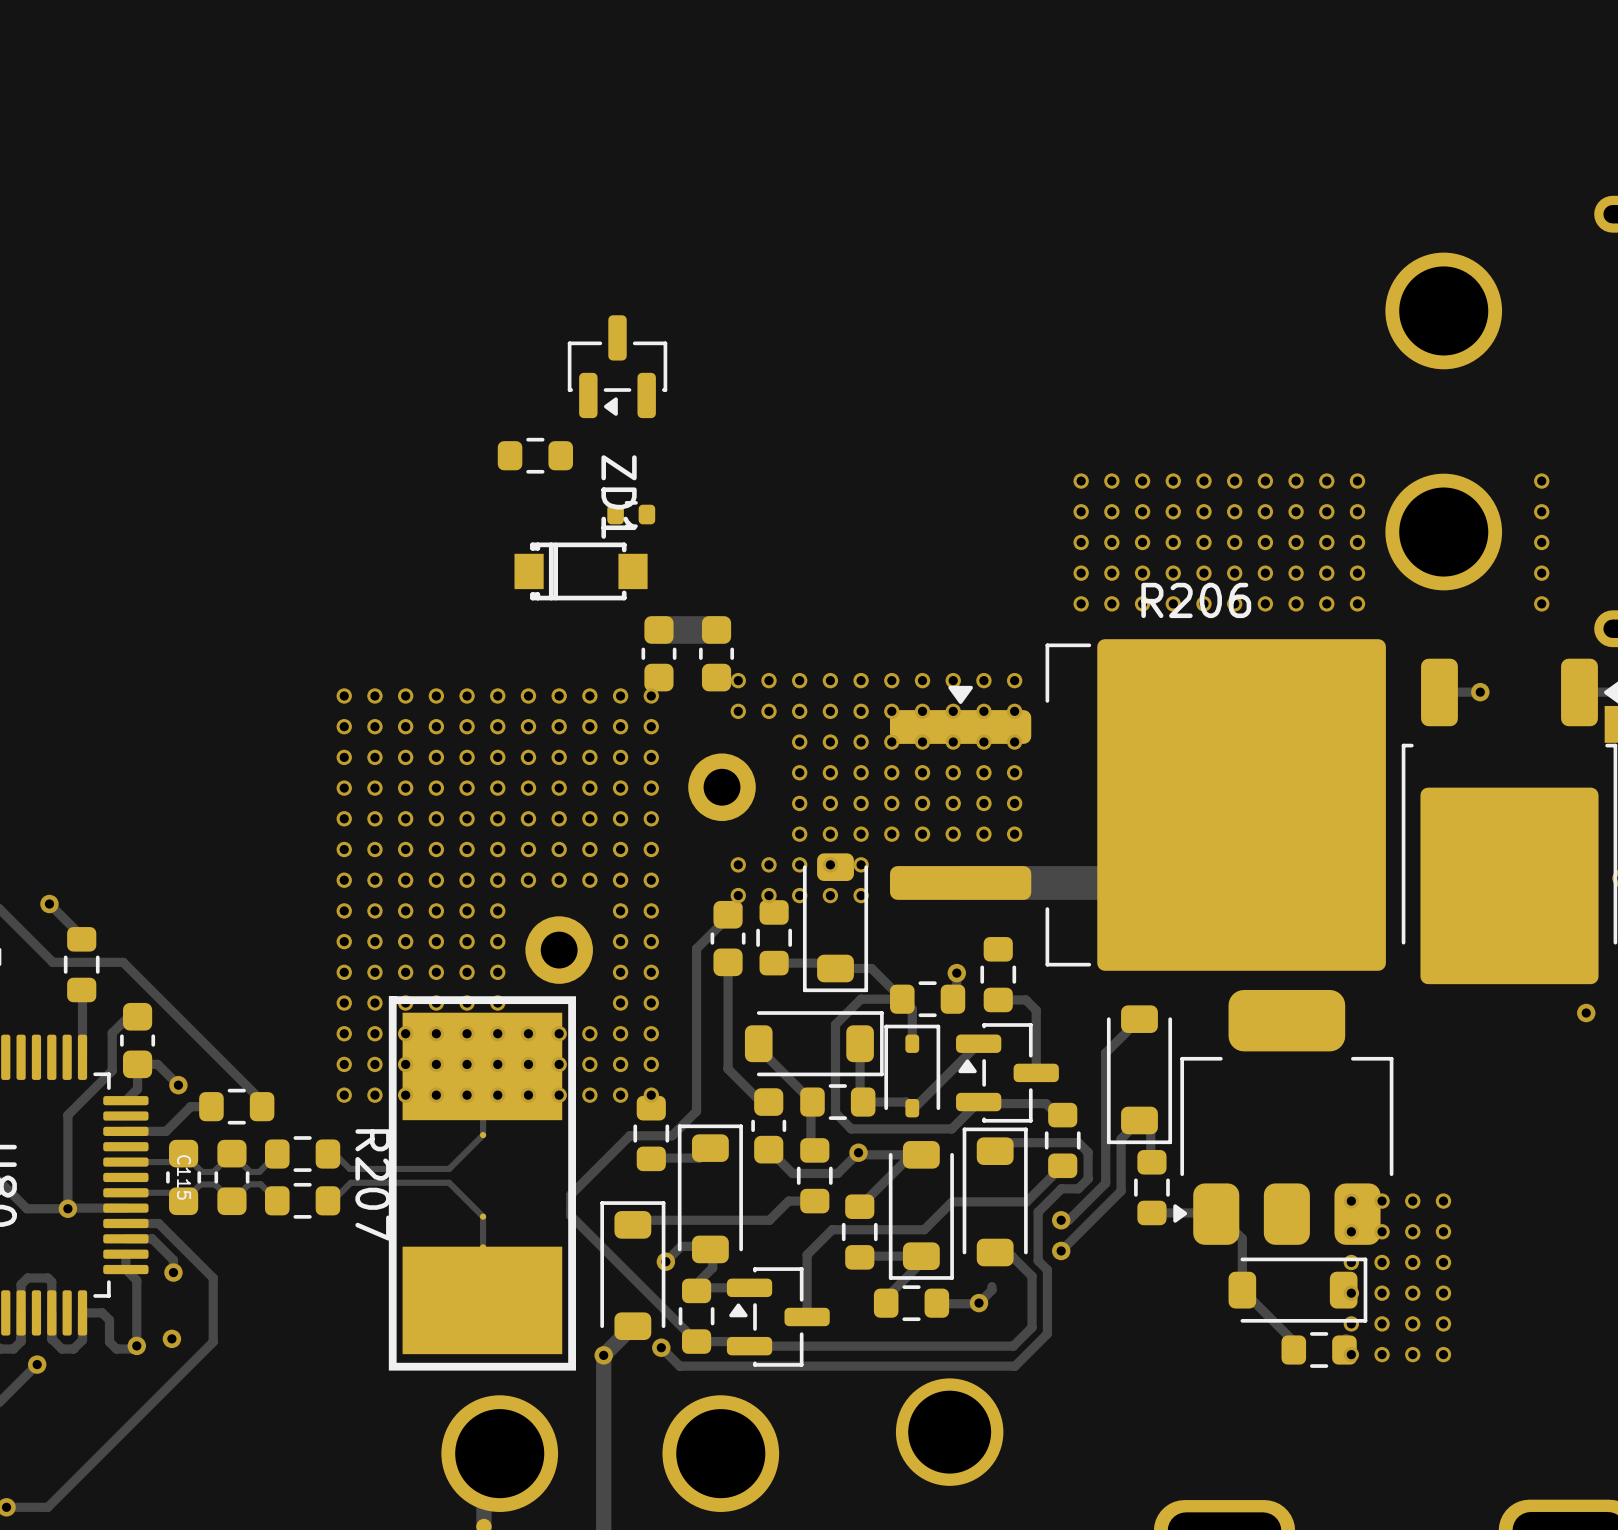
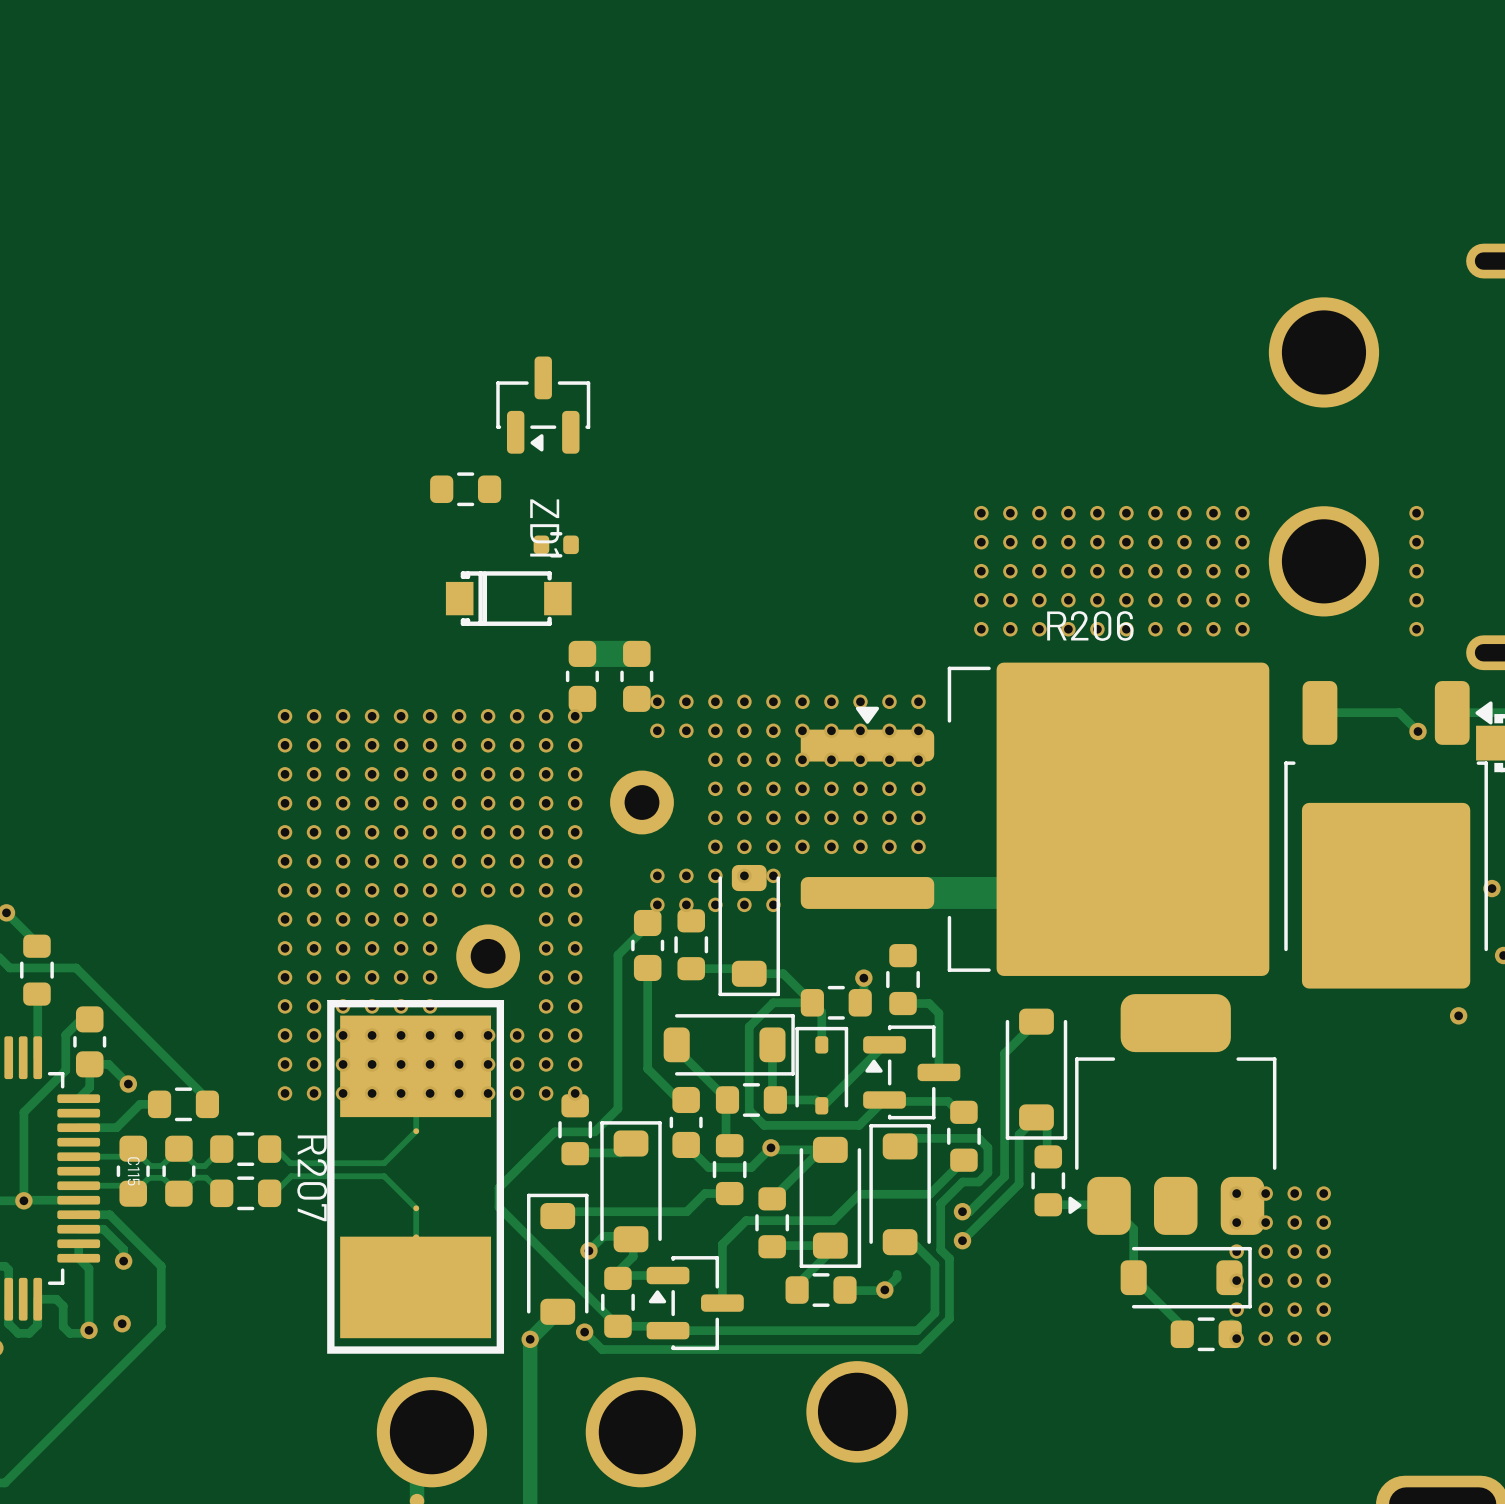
track: none -> (1358, 712) (1399, 712) (1418, 731)
via: (1480, 692) -> none
via: none -> (1418, 731)

